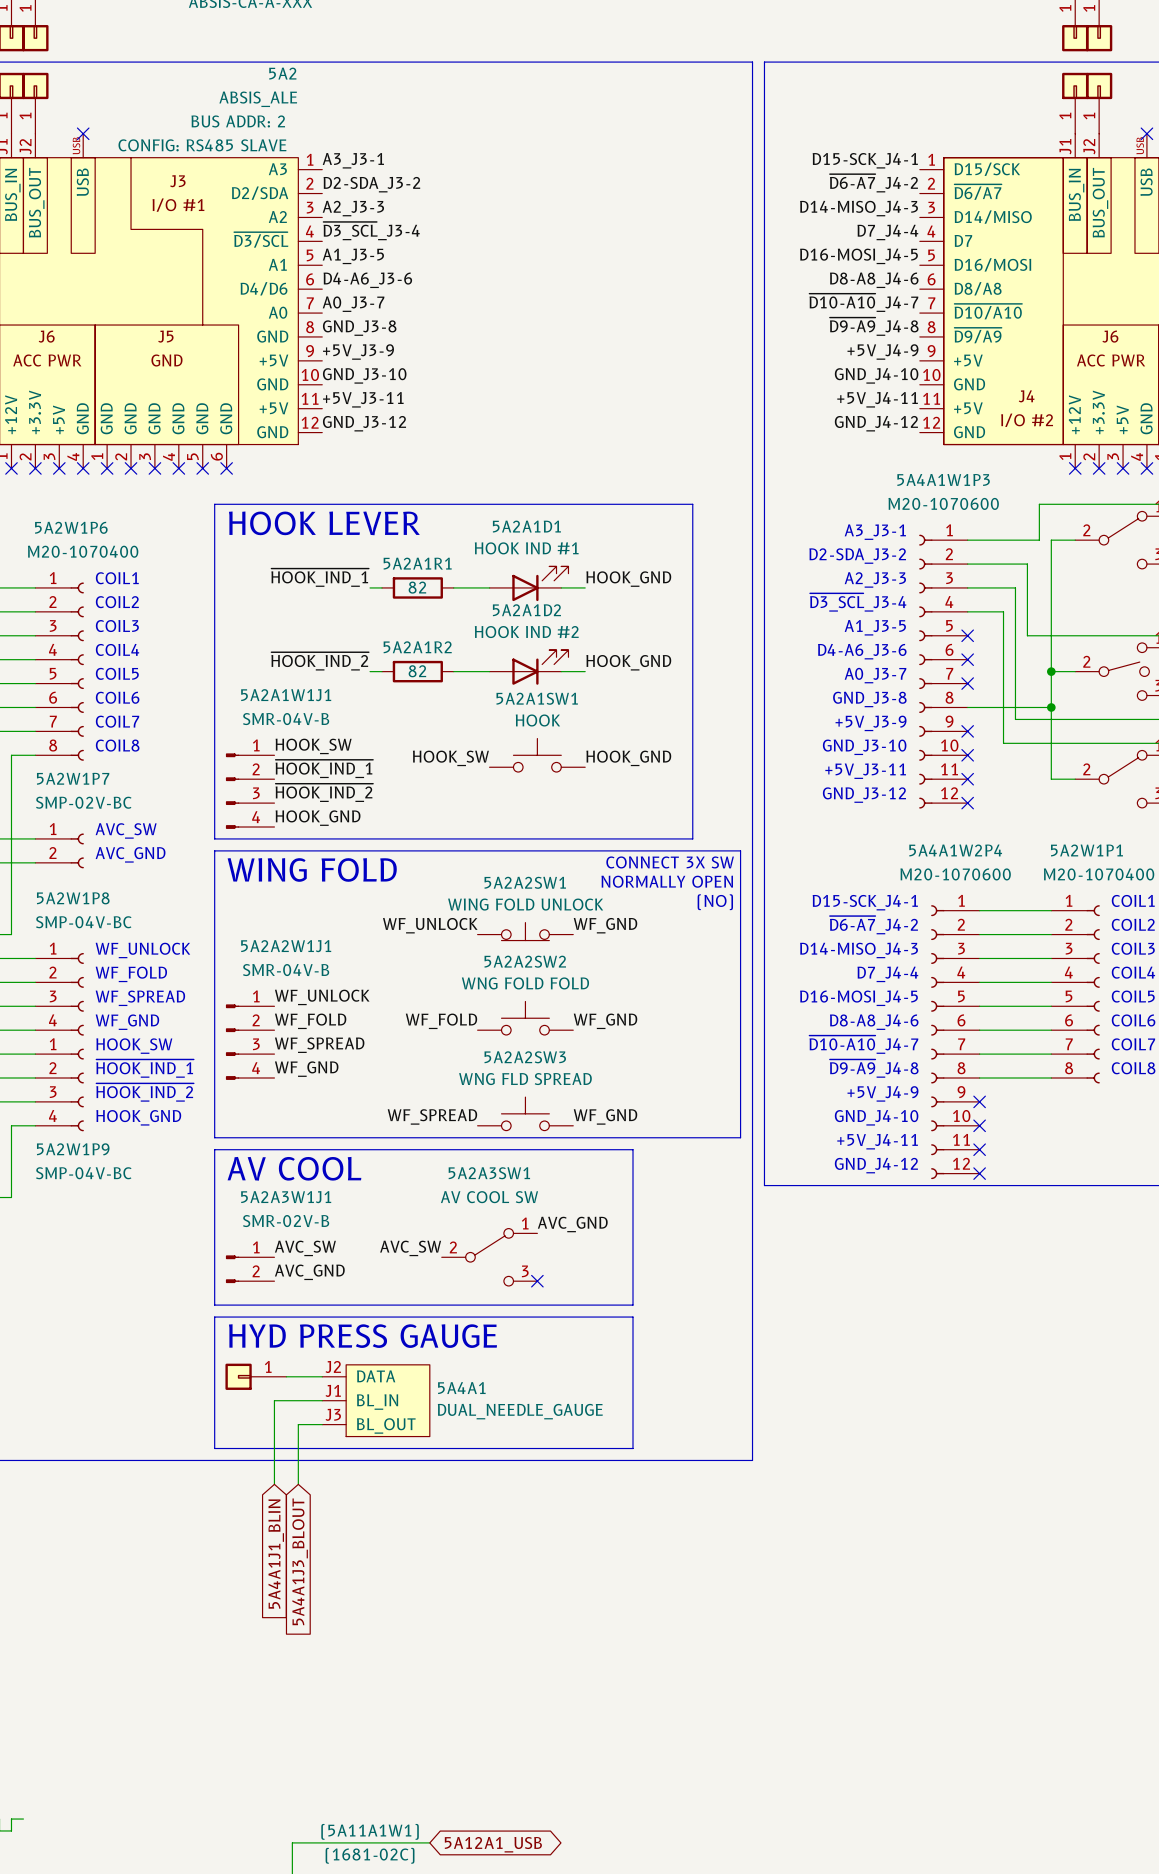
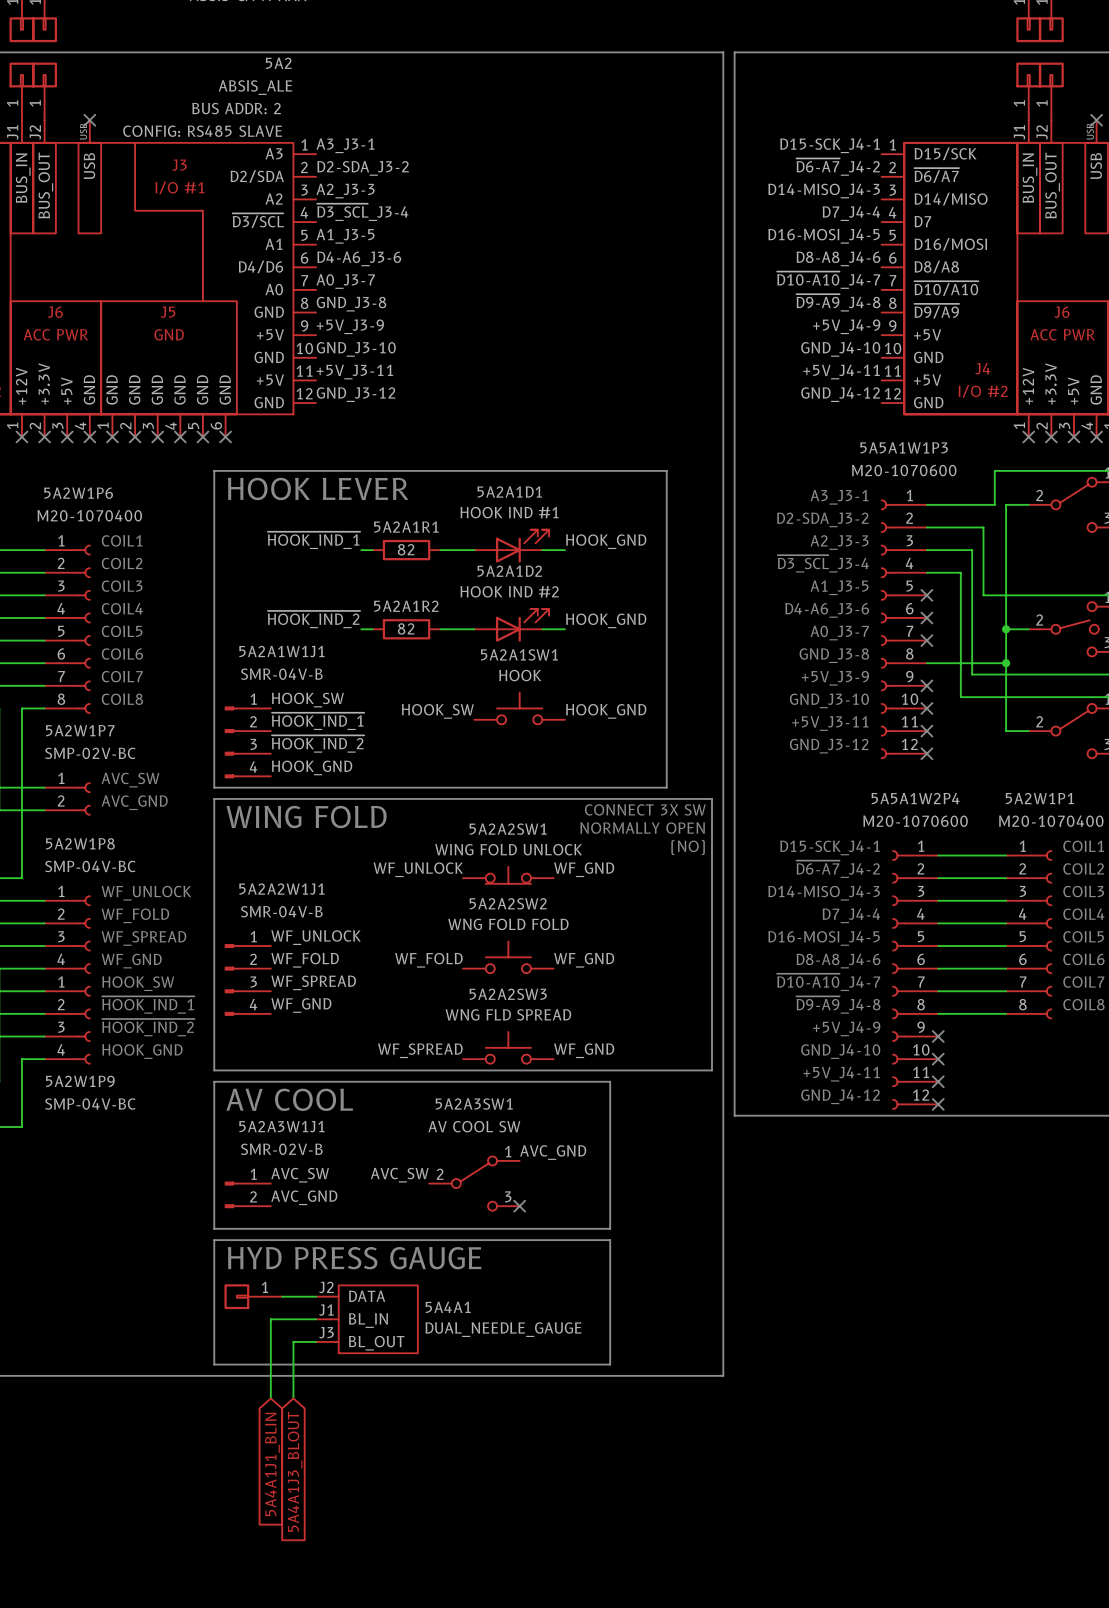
5A4A1W1P3 name: 5A4A1W1P3 (943, 479) -> 5A5A1W1P3 (904, 447)
5A4A1W2P4 name: 5A4A1W2P4 (955, 850) -> 5A5A1W2P4 (915, 798)

